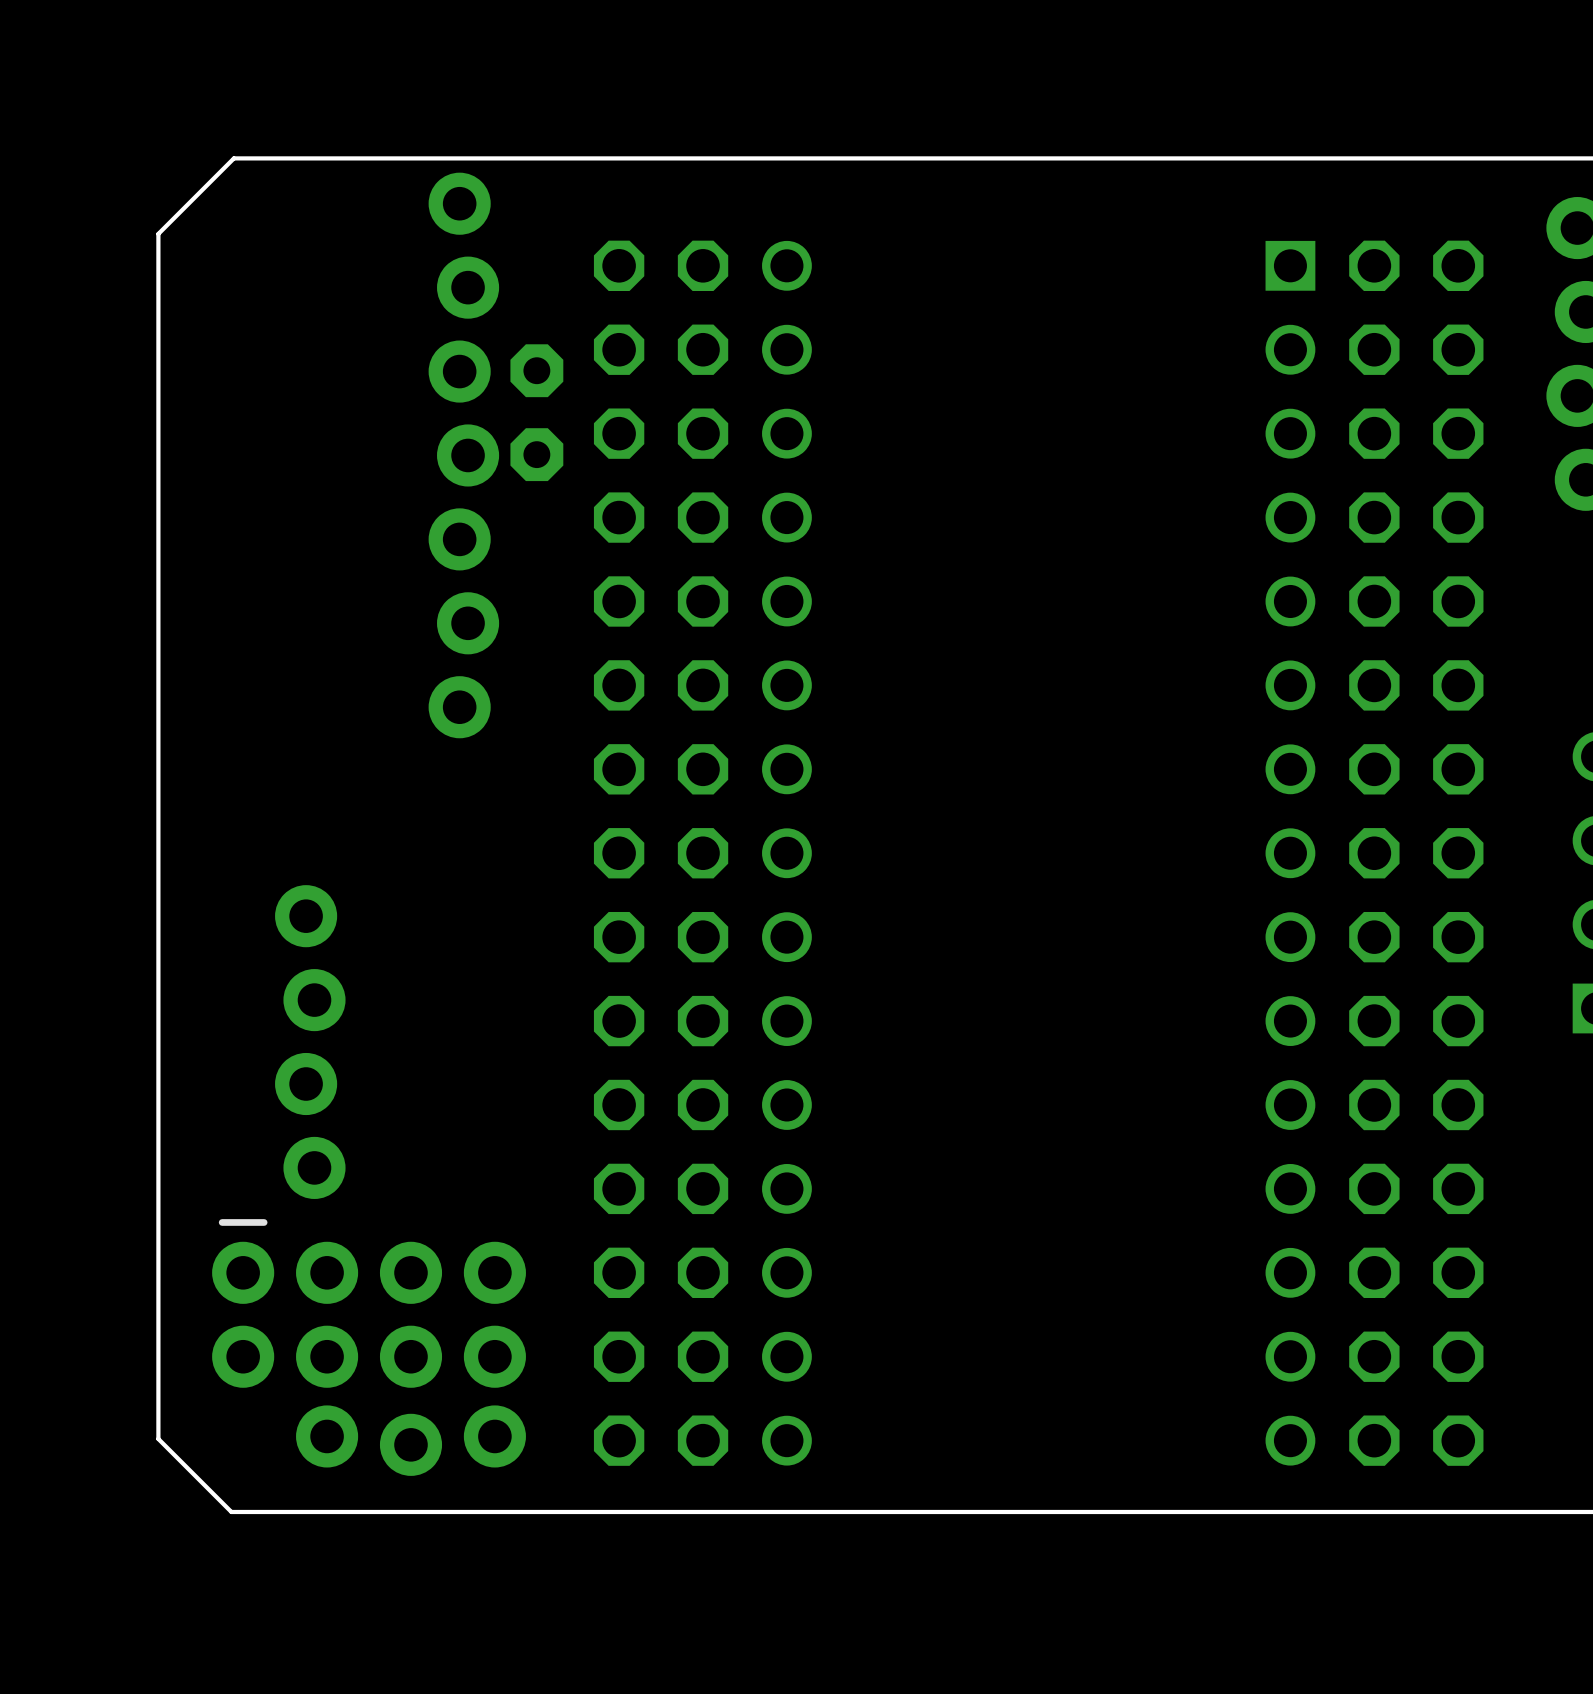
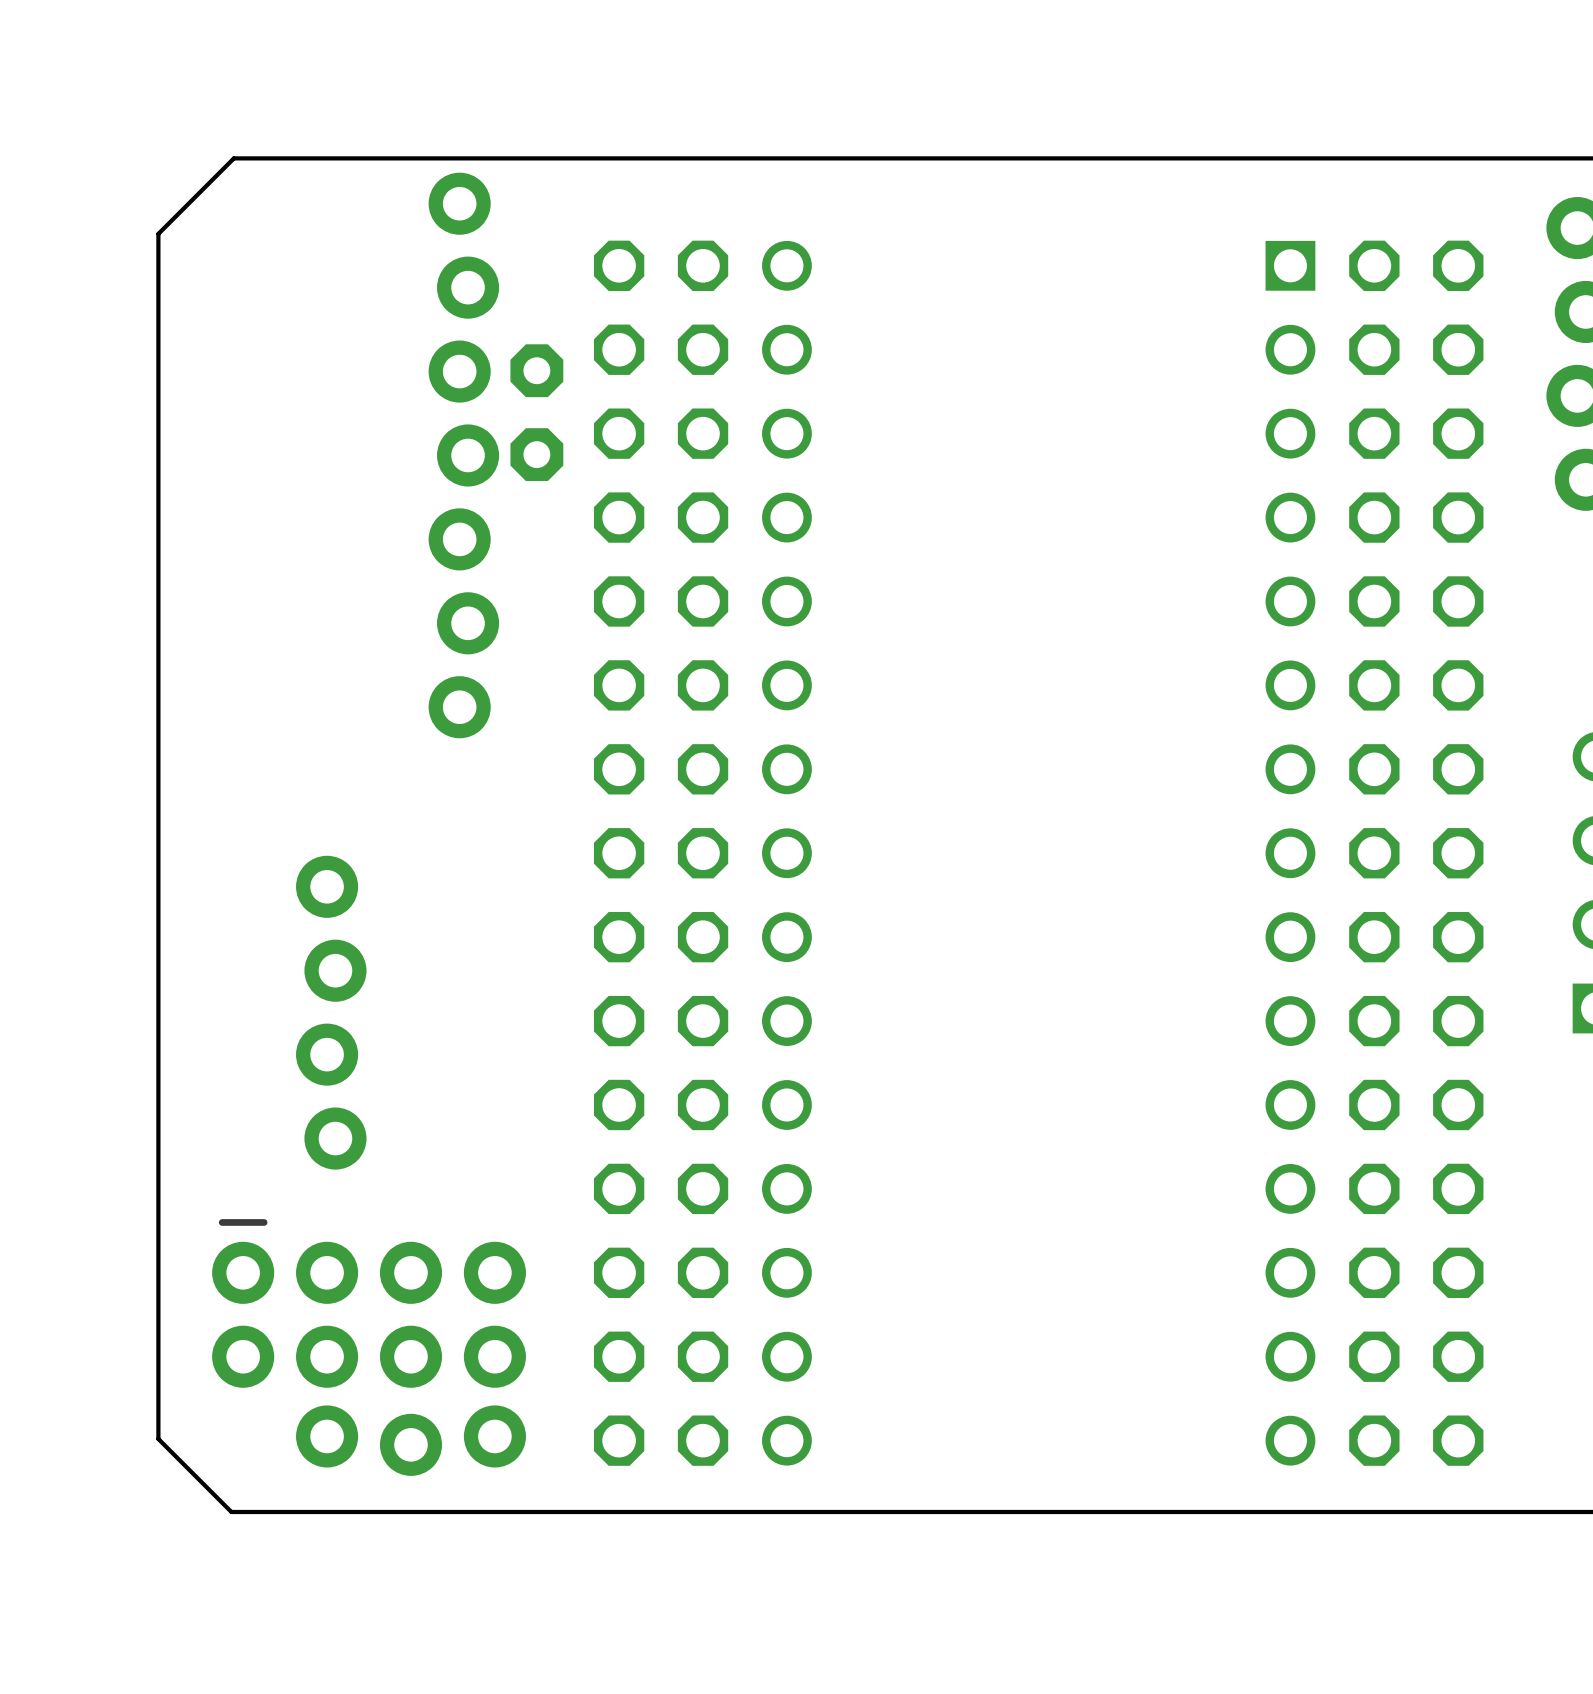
part position: (310, 1042) -> (331, 1012)

